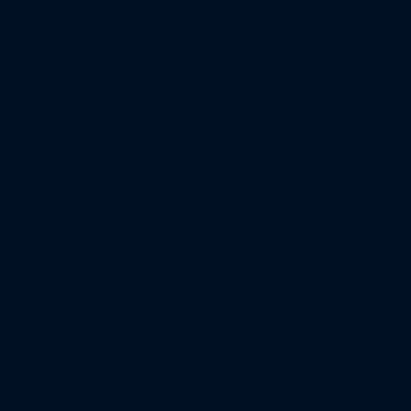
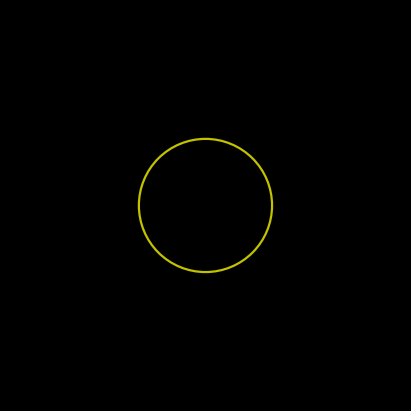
round board edge: none -> [137, 137, 274, 274]

